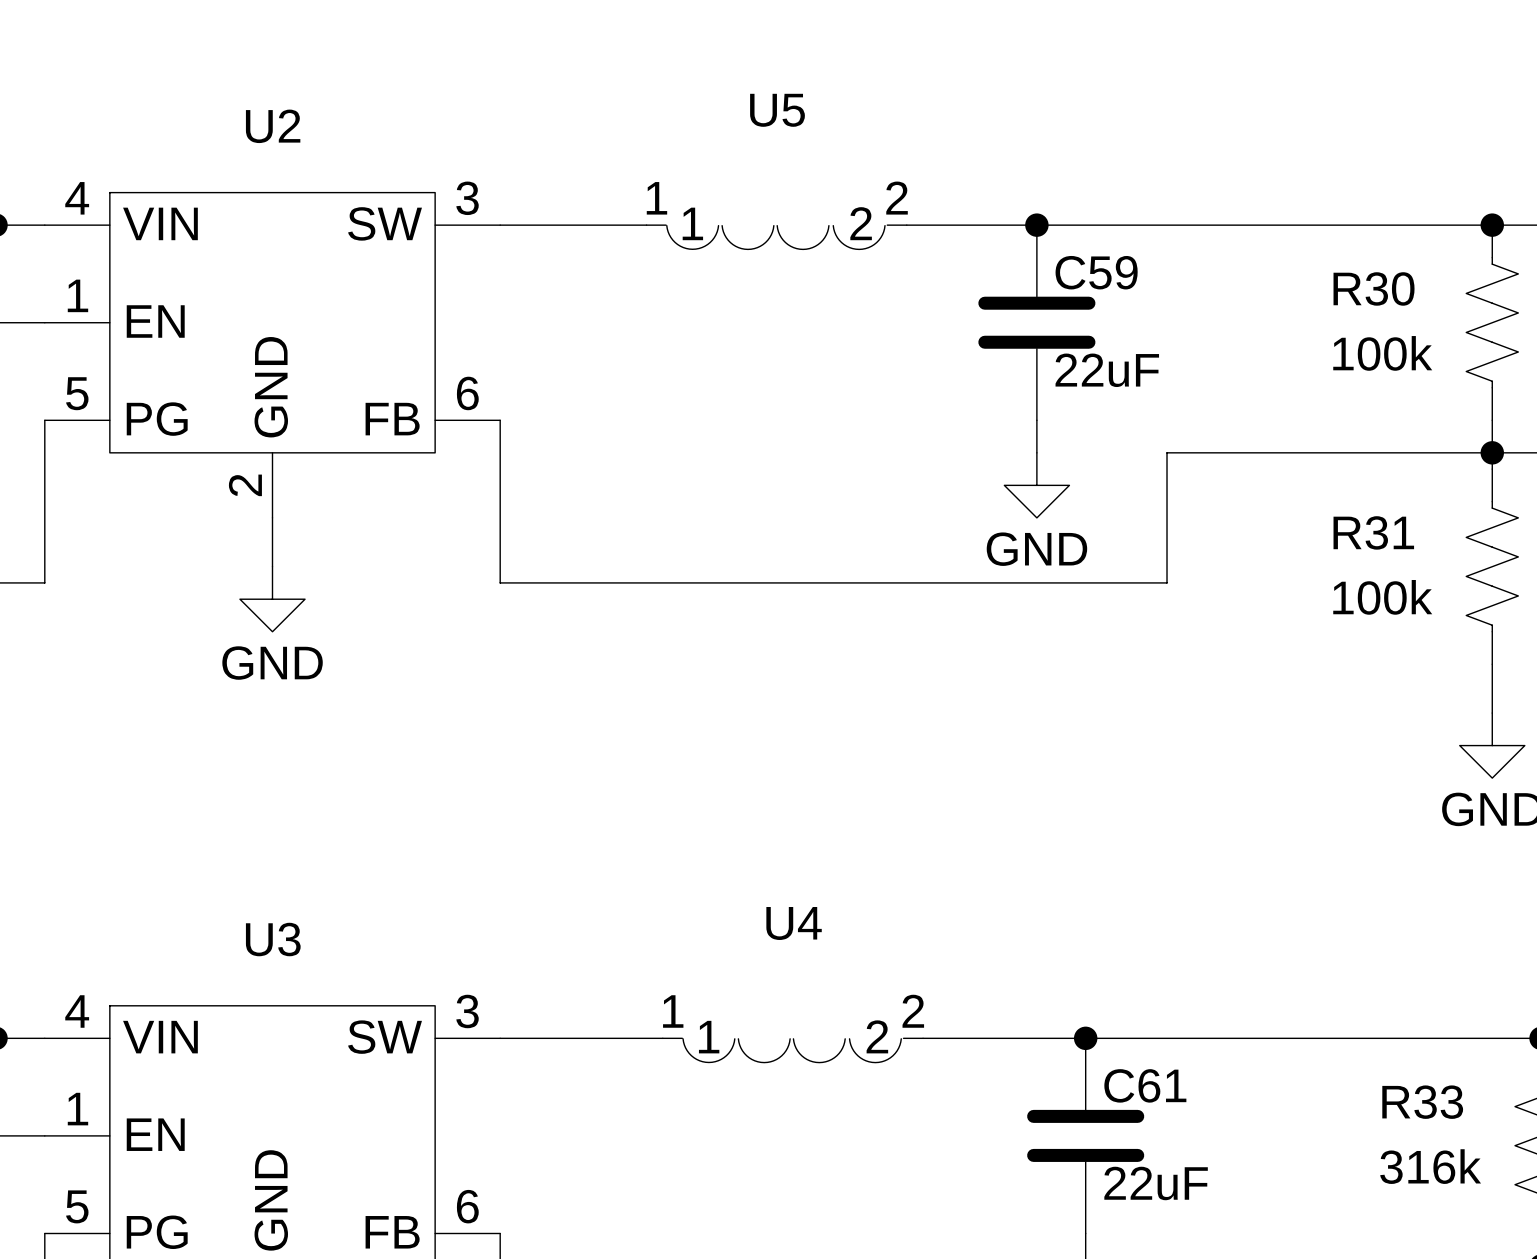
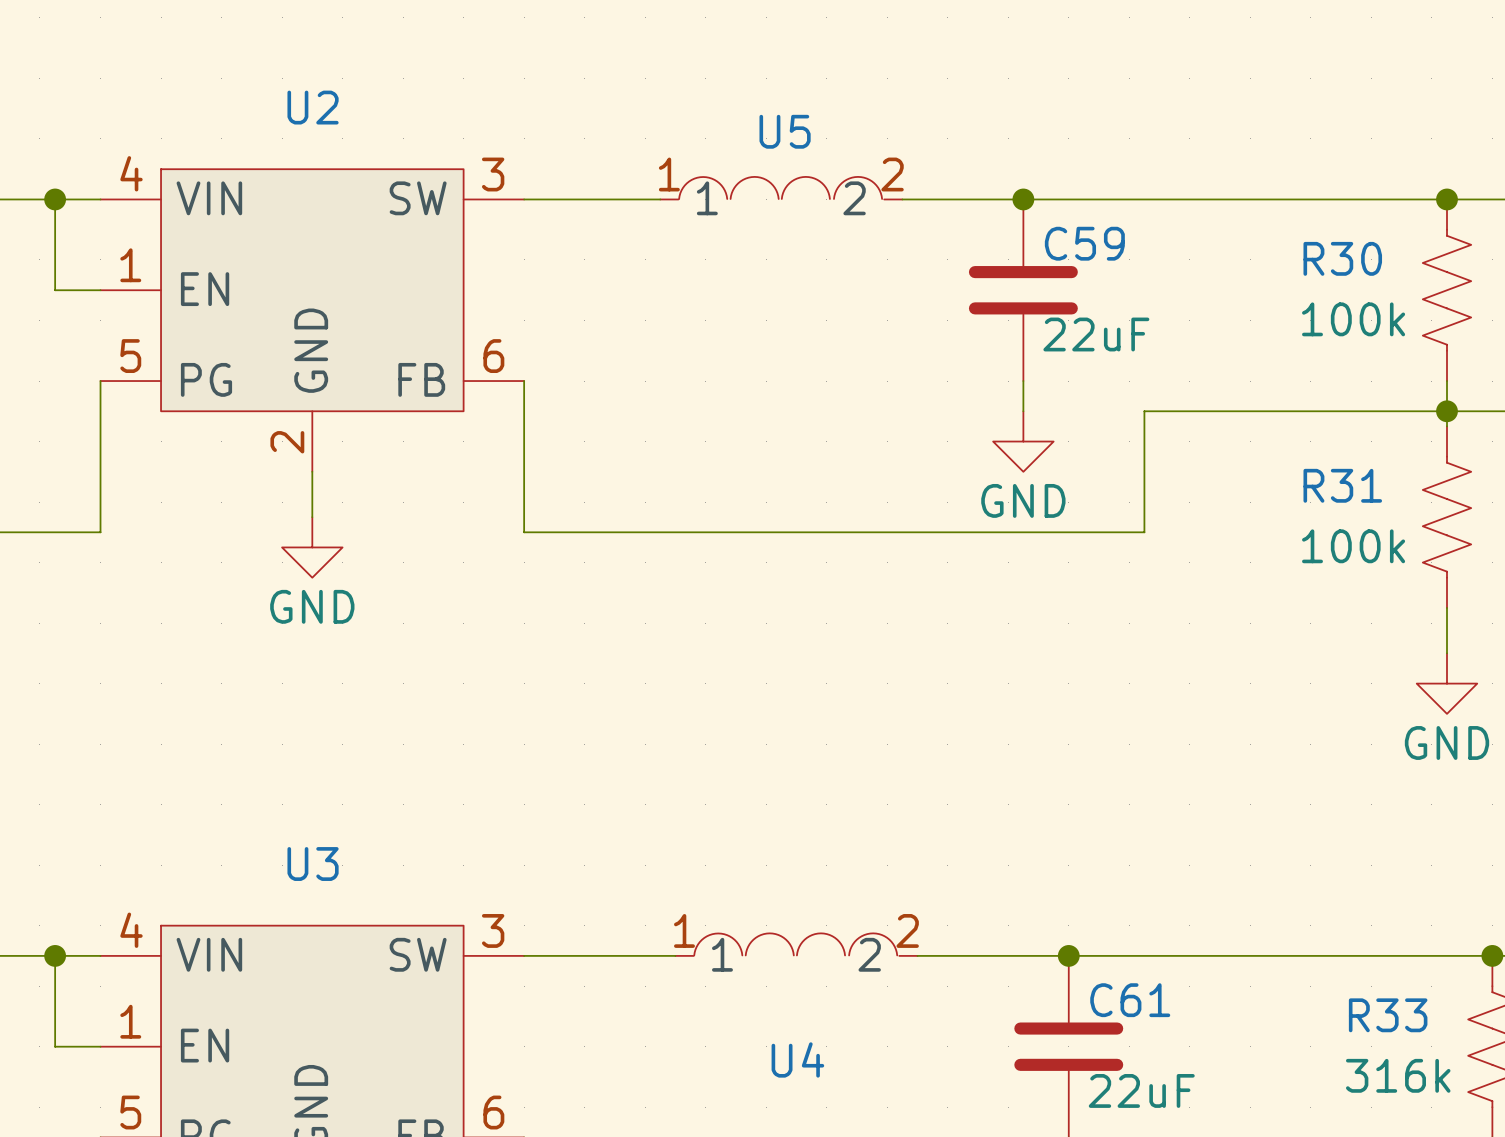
U5 name position: U5 (777, 110) -> U5 (785, 131)
U5 flip: as is (775, 237) -> up-down (780, 187)
U4 flip: as is (792, 1050) -> up-down (795, 944)

